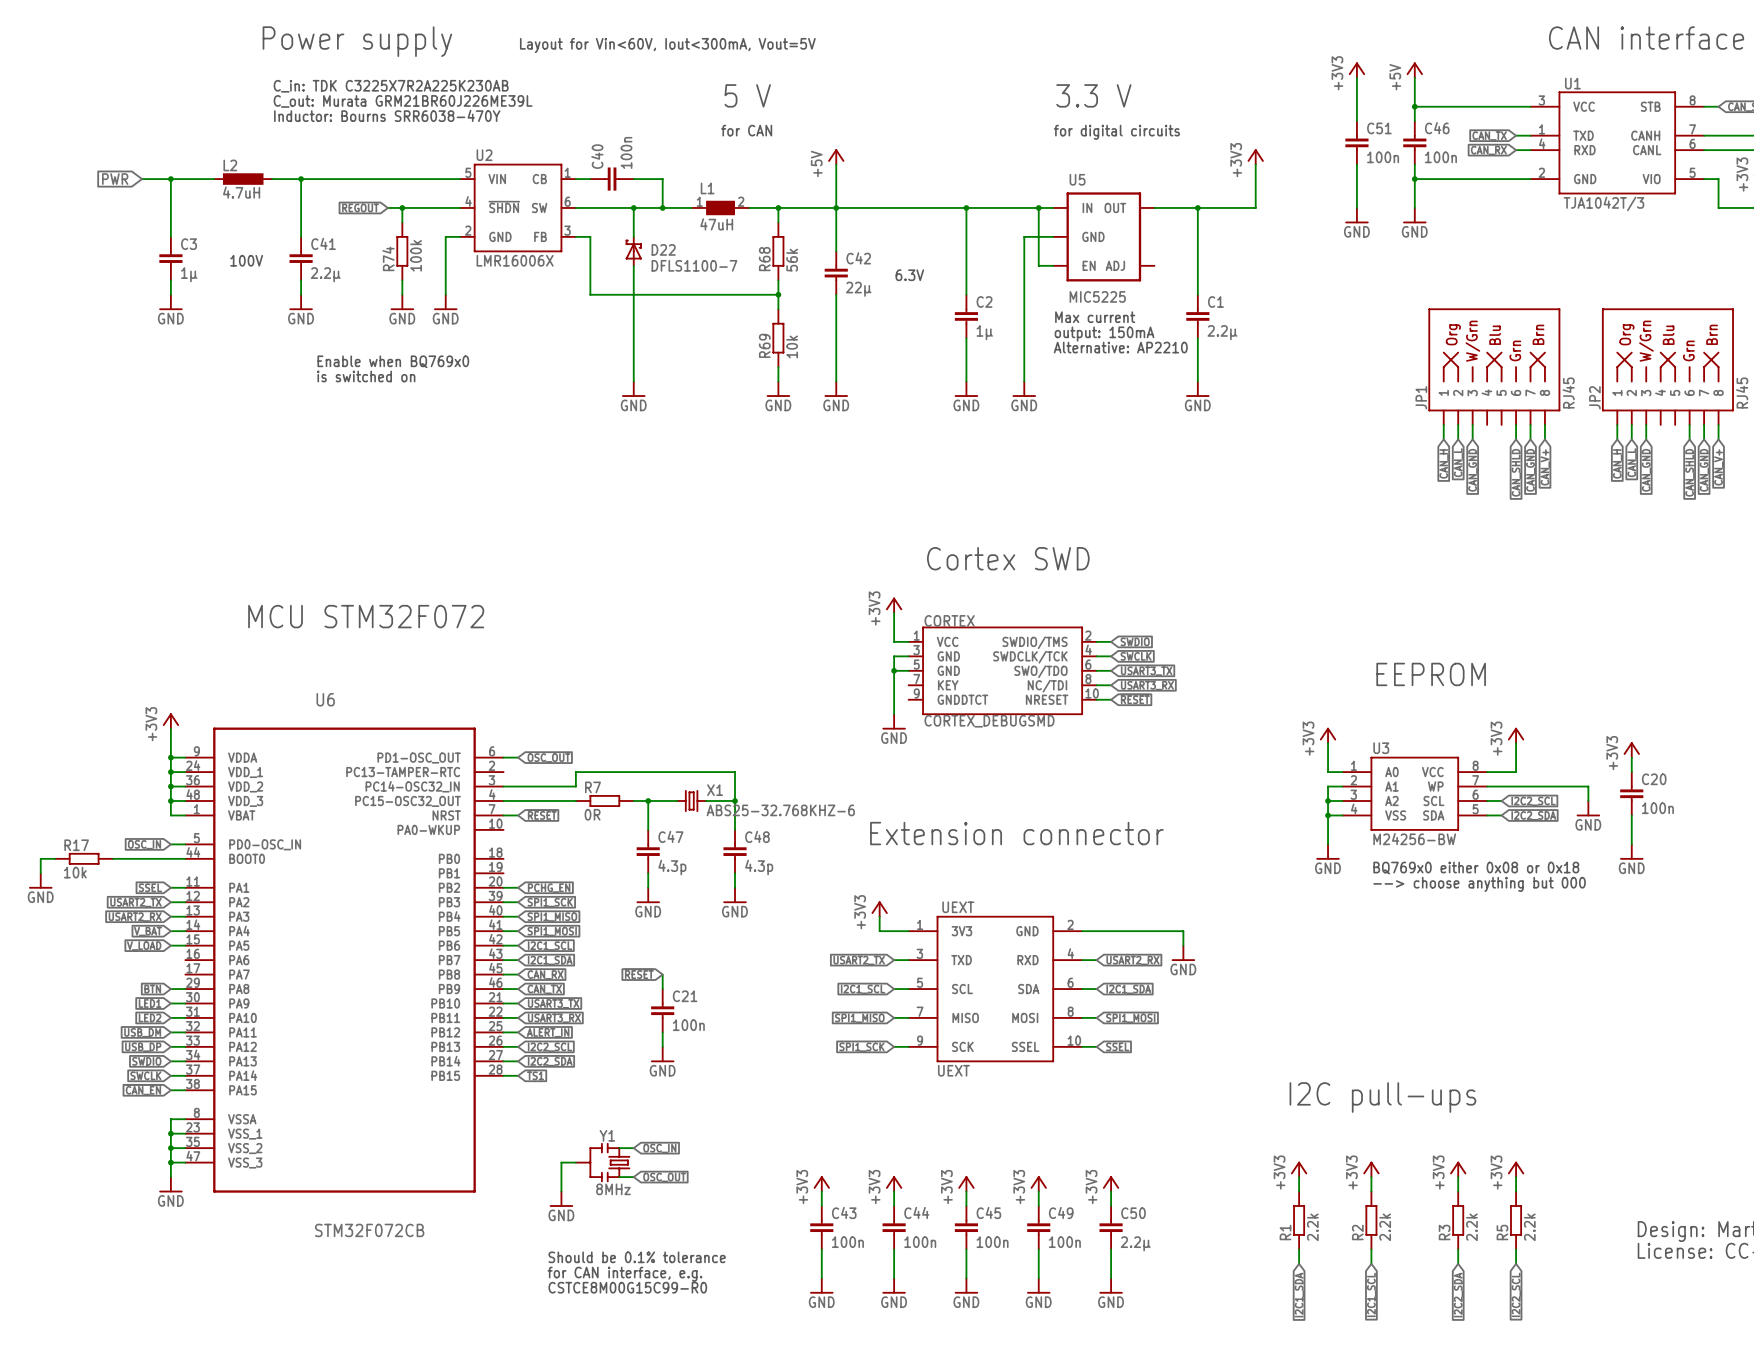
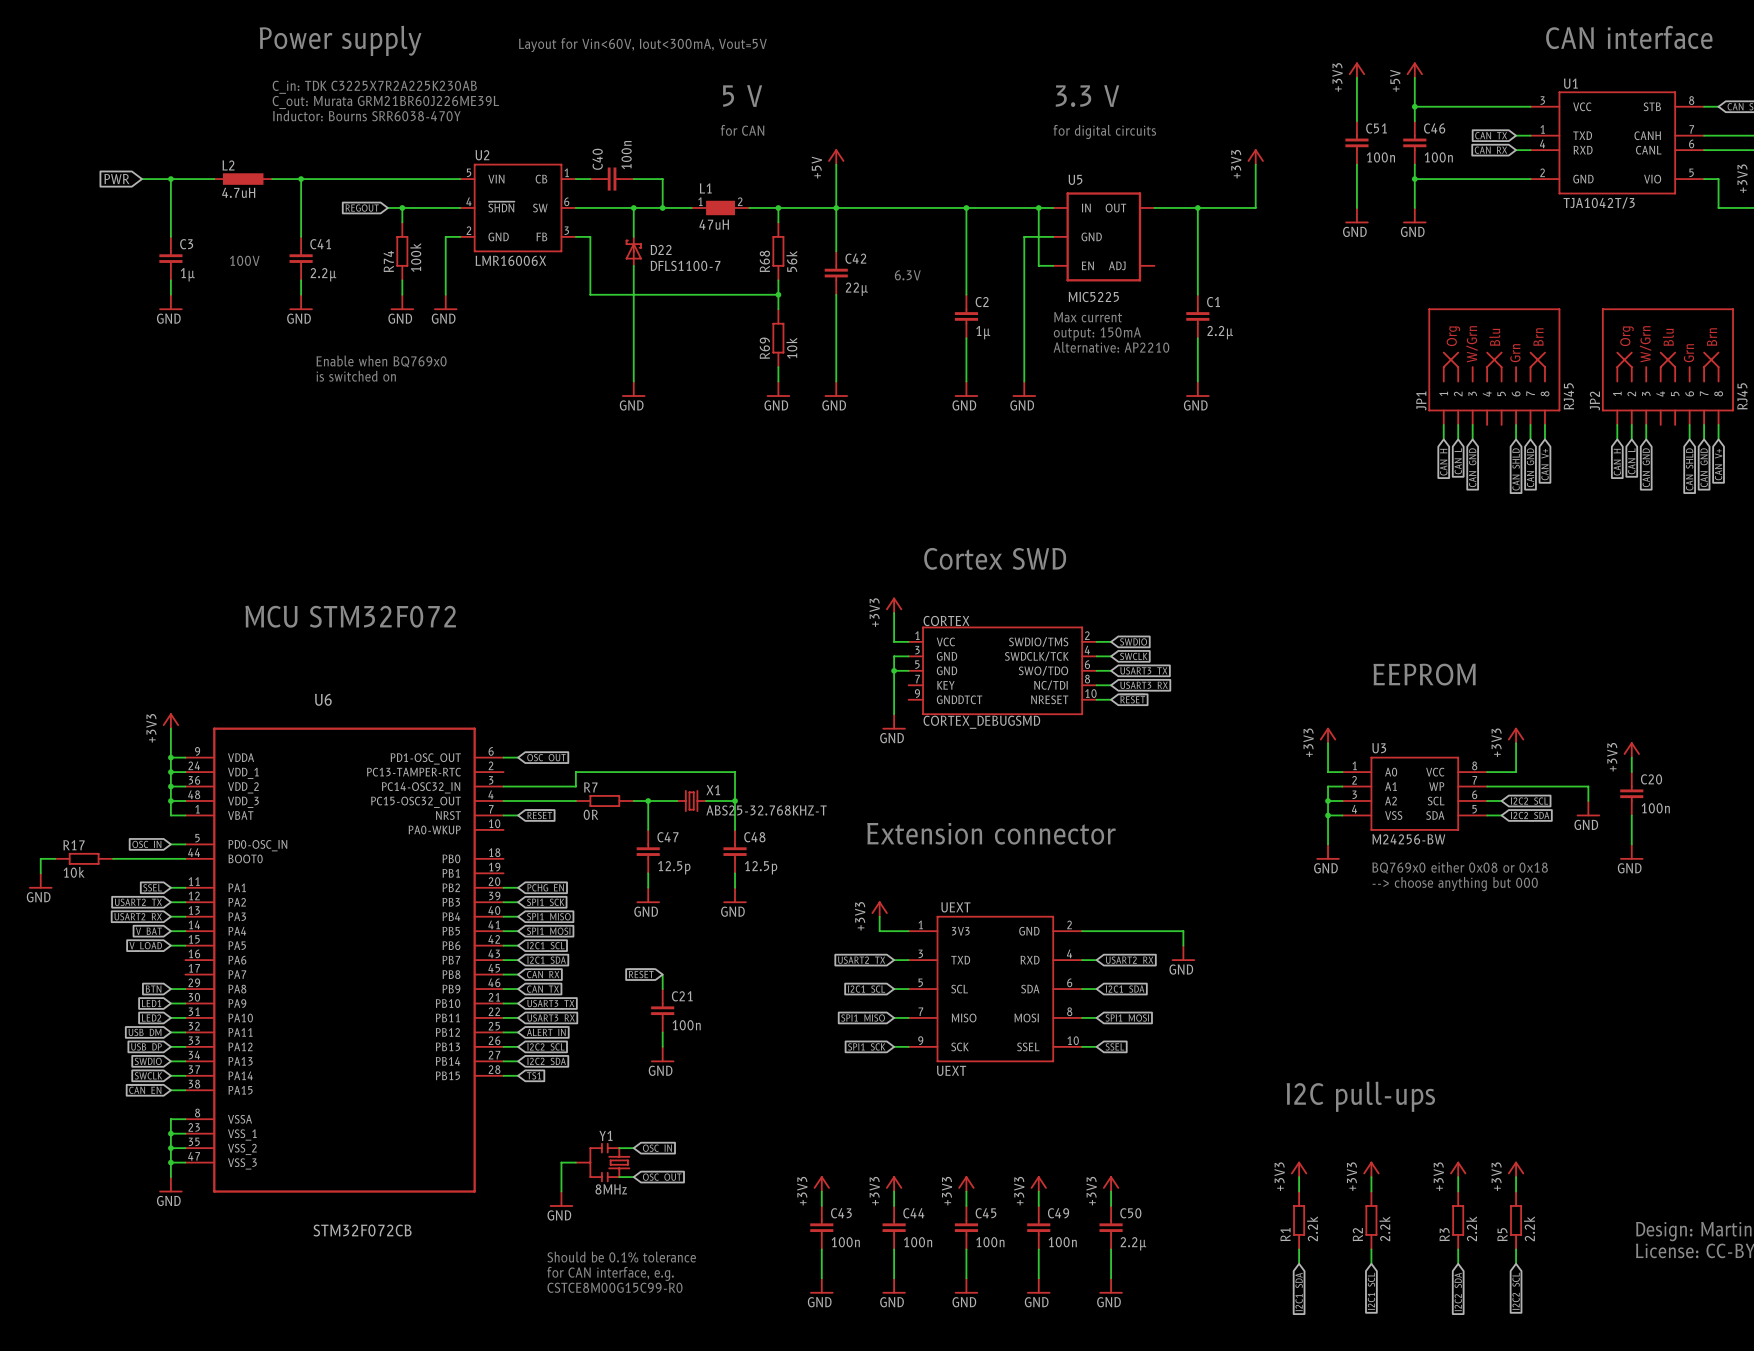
X1 value: ABS25-32.768KHZ-6 (780, 810) -> ABS25-32.768KHZ-T (766, 810)
C47 value: 4.3p (672, 867) -> 12.5p (674, 867)
C48 value: 4.3p (759, 867) -> 12.5p (761, 867)

